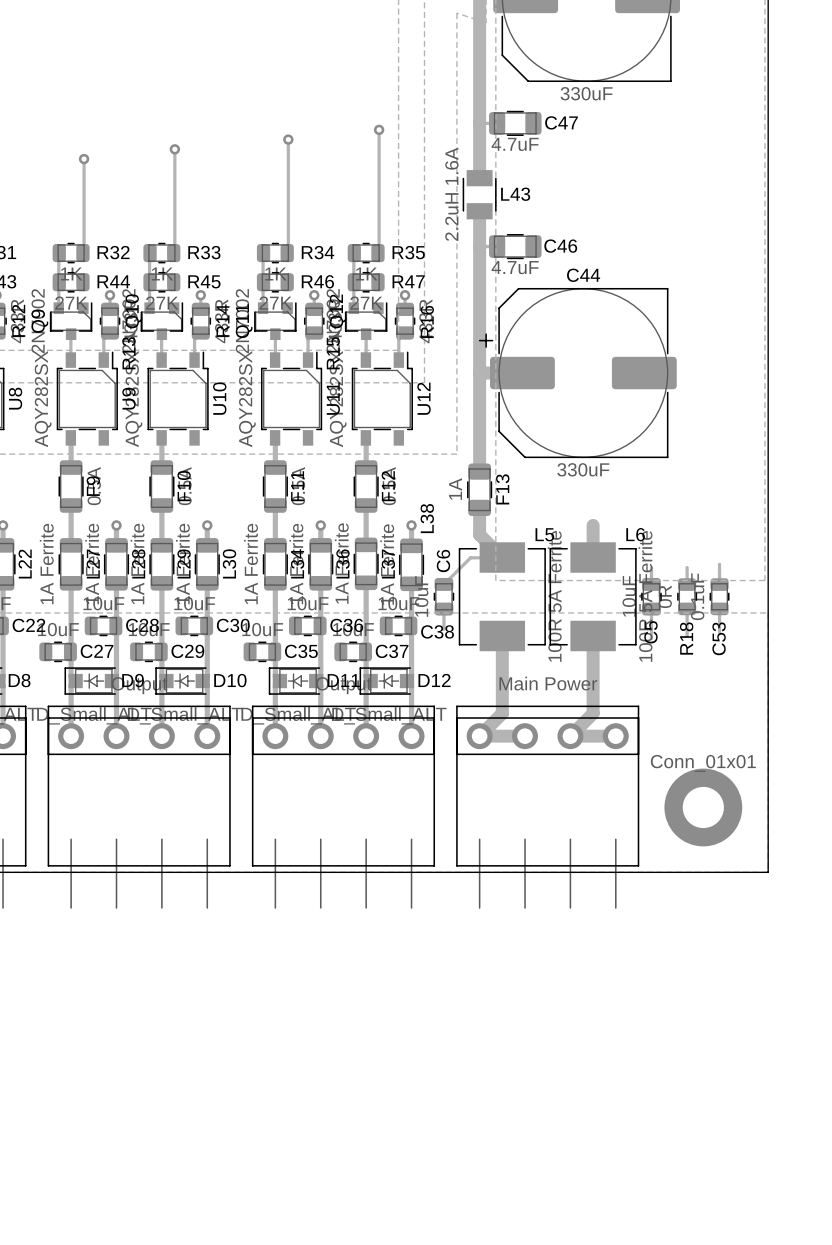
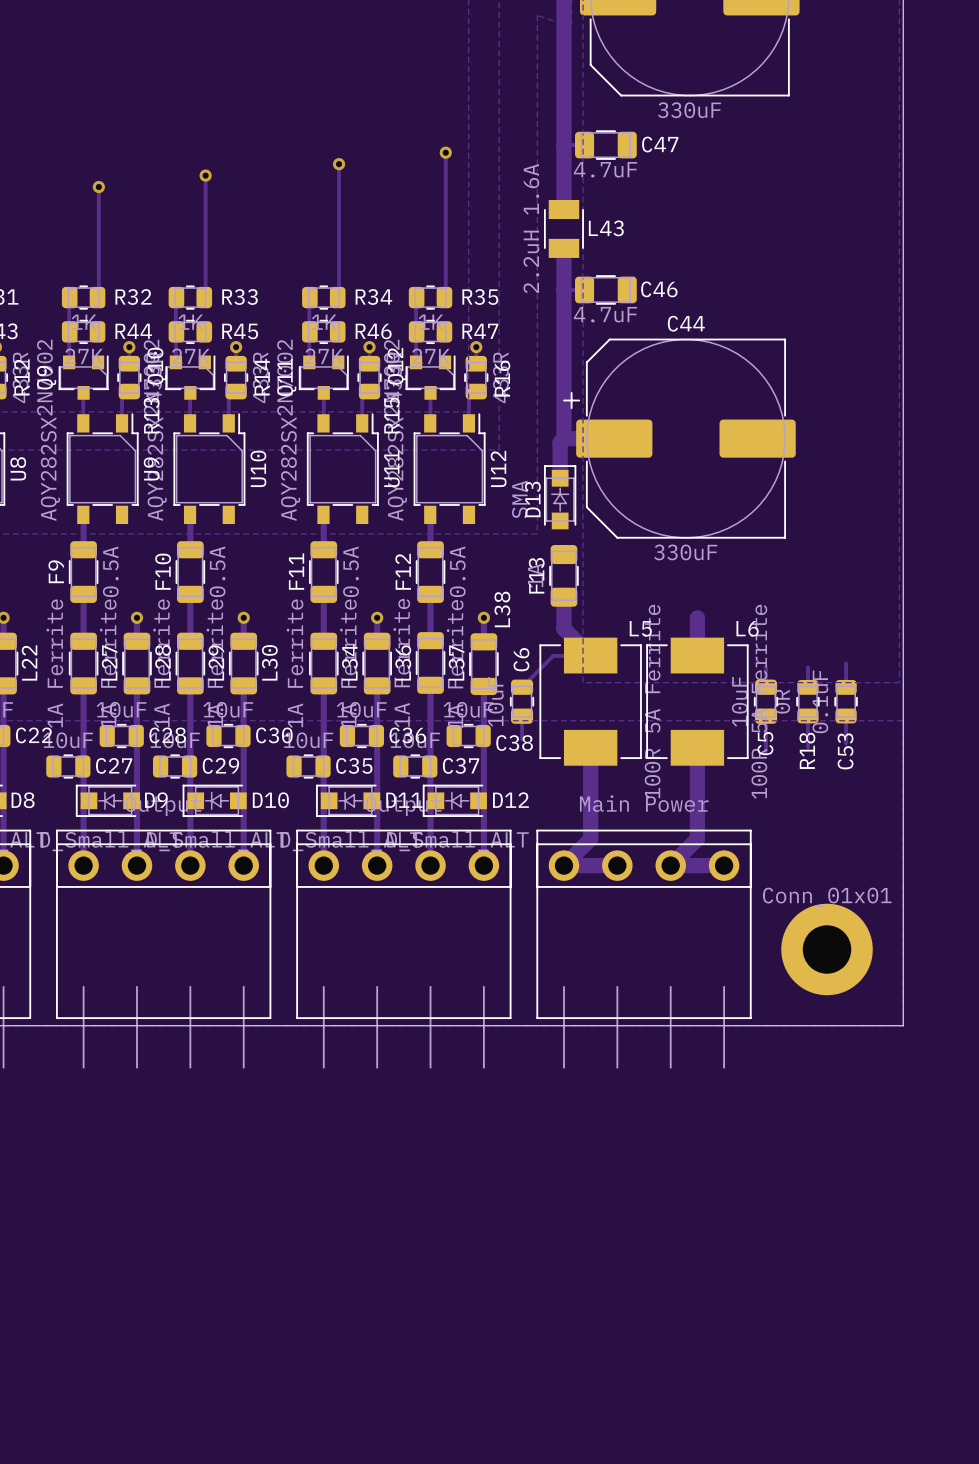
track: (479, 373) (479, 471) -> (563, 438) (560, 442) (560, 474)
D13: none -> SMA (560, 497)
F9 name position: F9 (93, 486) -> F9 (56, 571)
F10 name position: F10 (184, 486) -> F10 (163, 571)
F11 name position: F11 (297, 486) -> F11 (296, 571)
F12 name position: F12 (388, 486) -> F12 (403, 571)
F13 name position: F13 (502, 489) -> F13 (536, 575)

